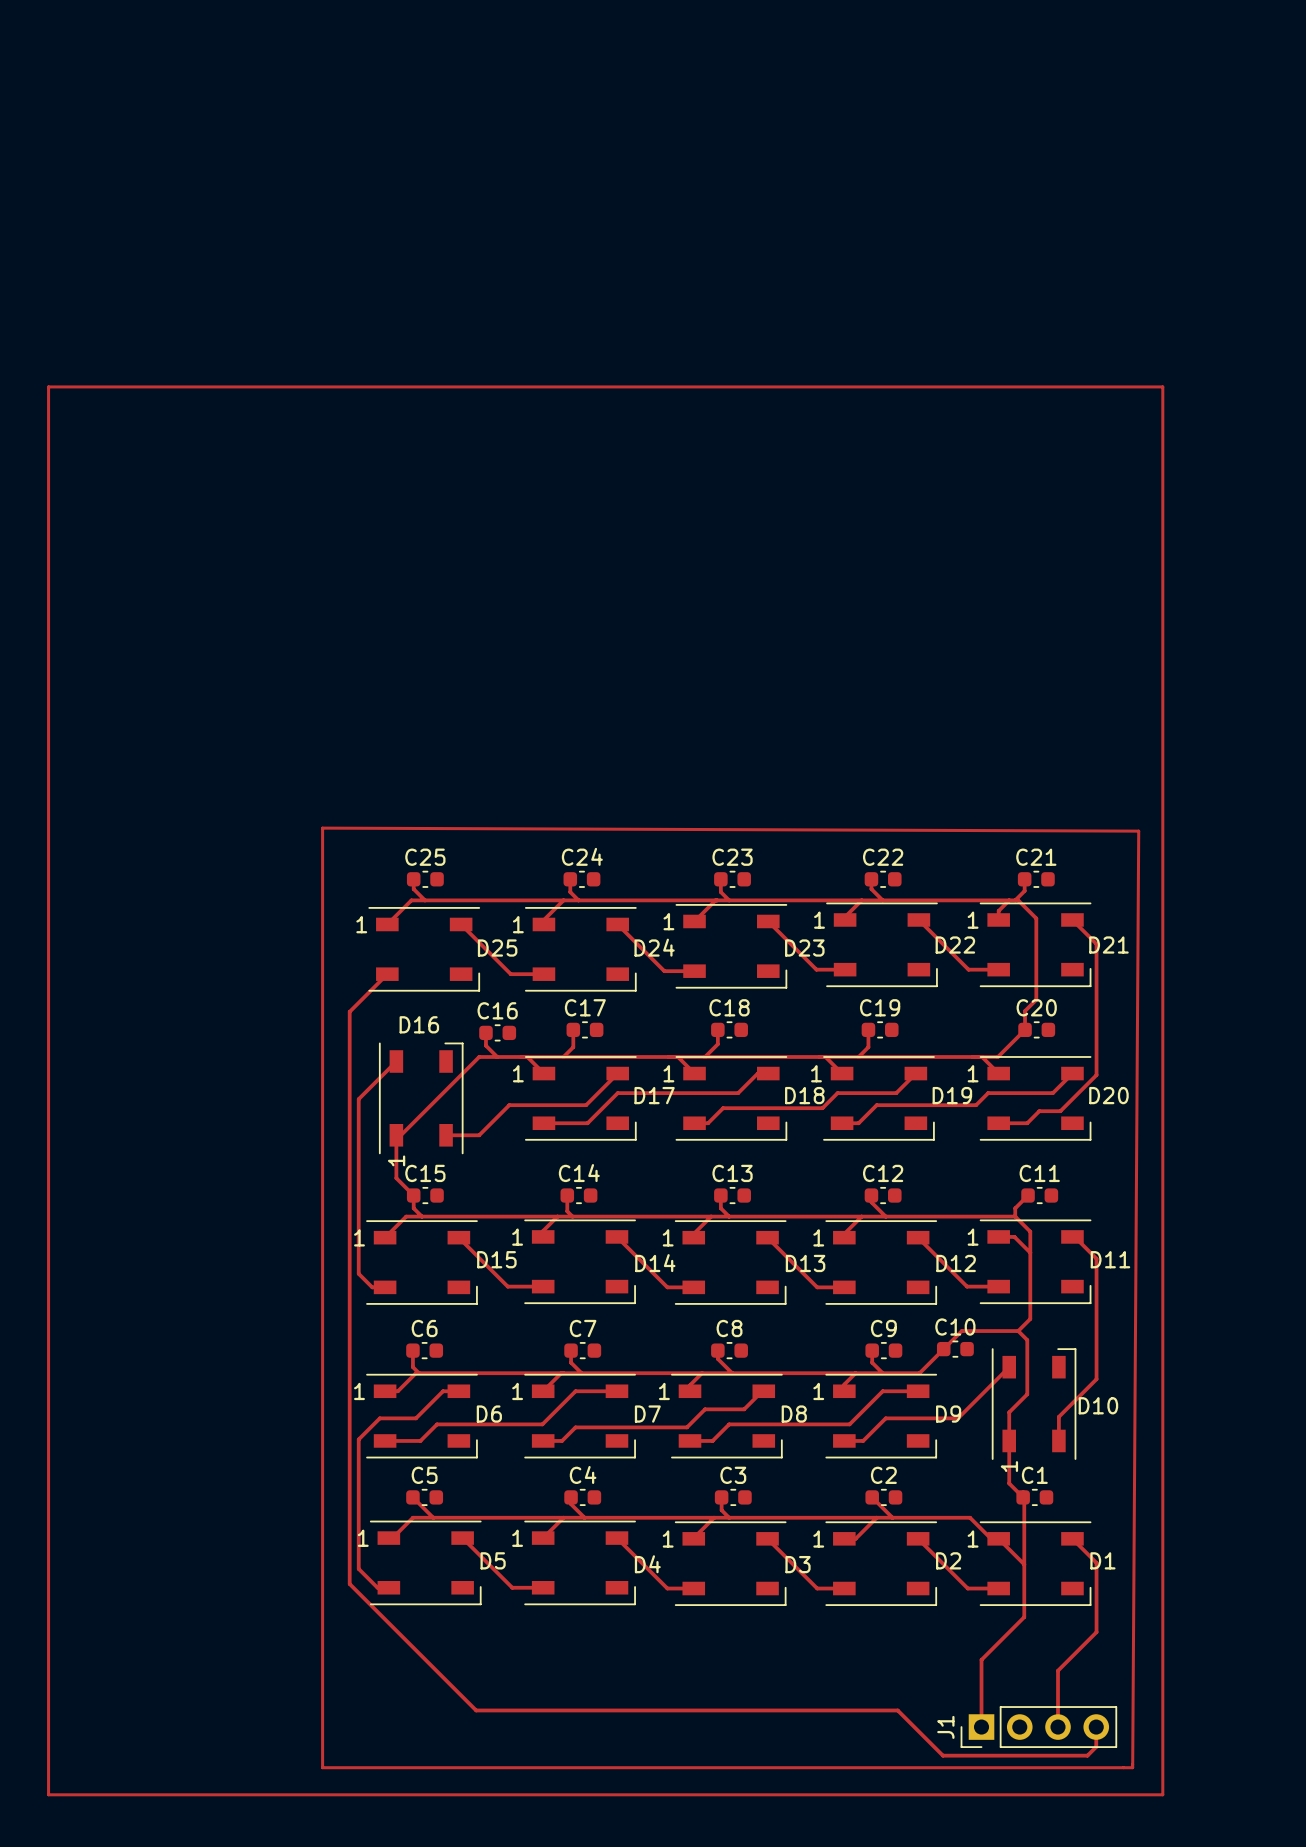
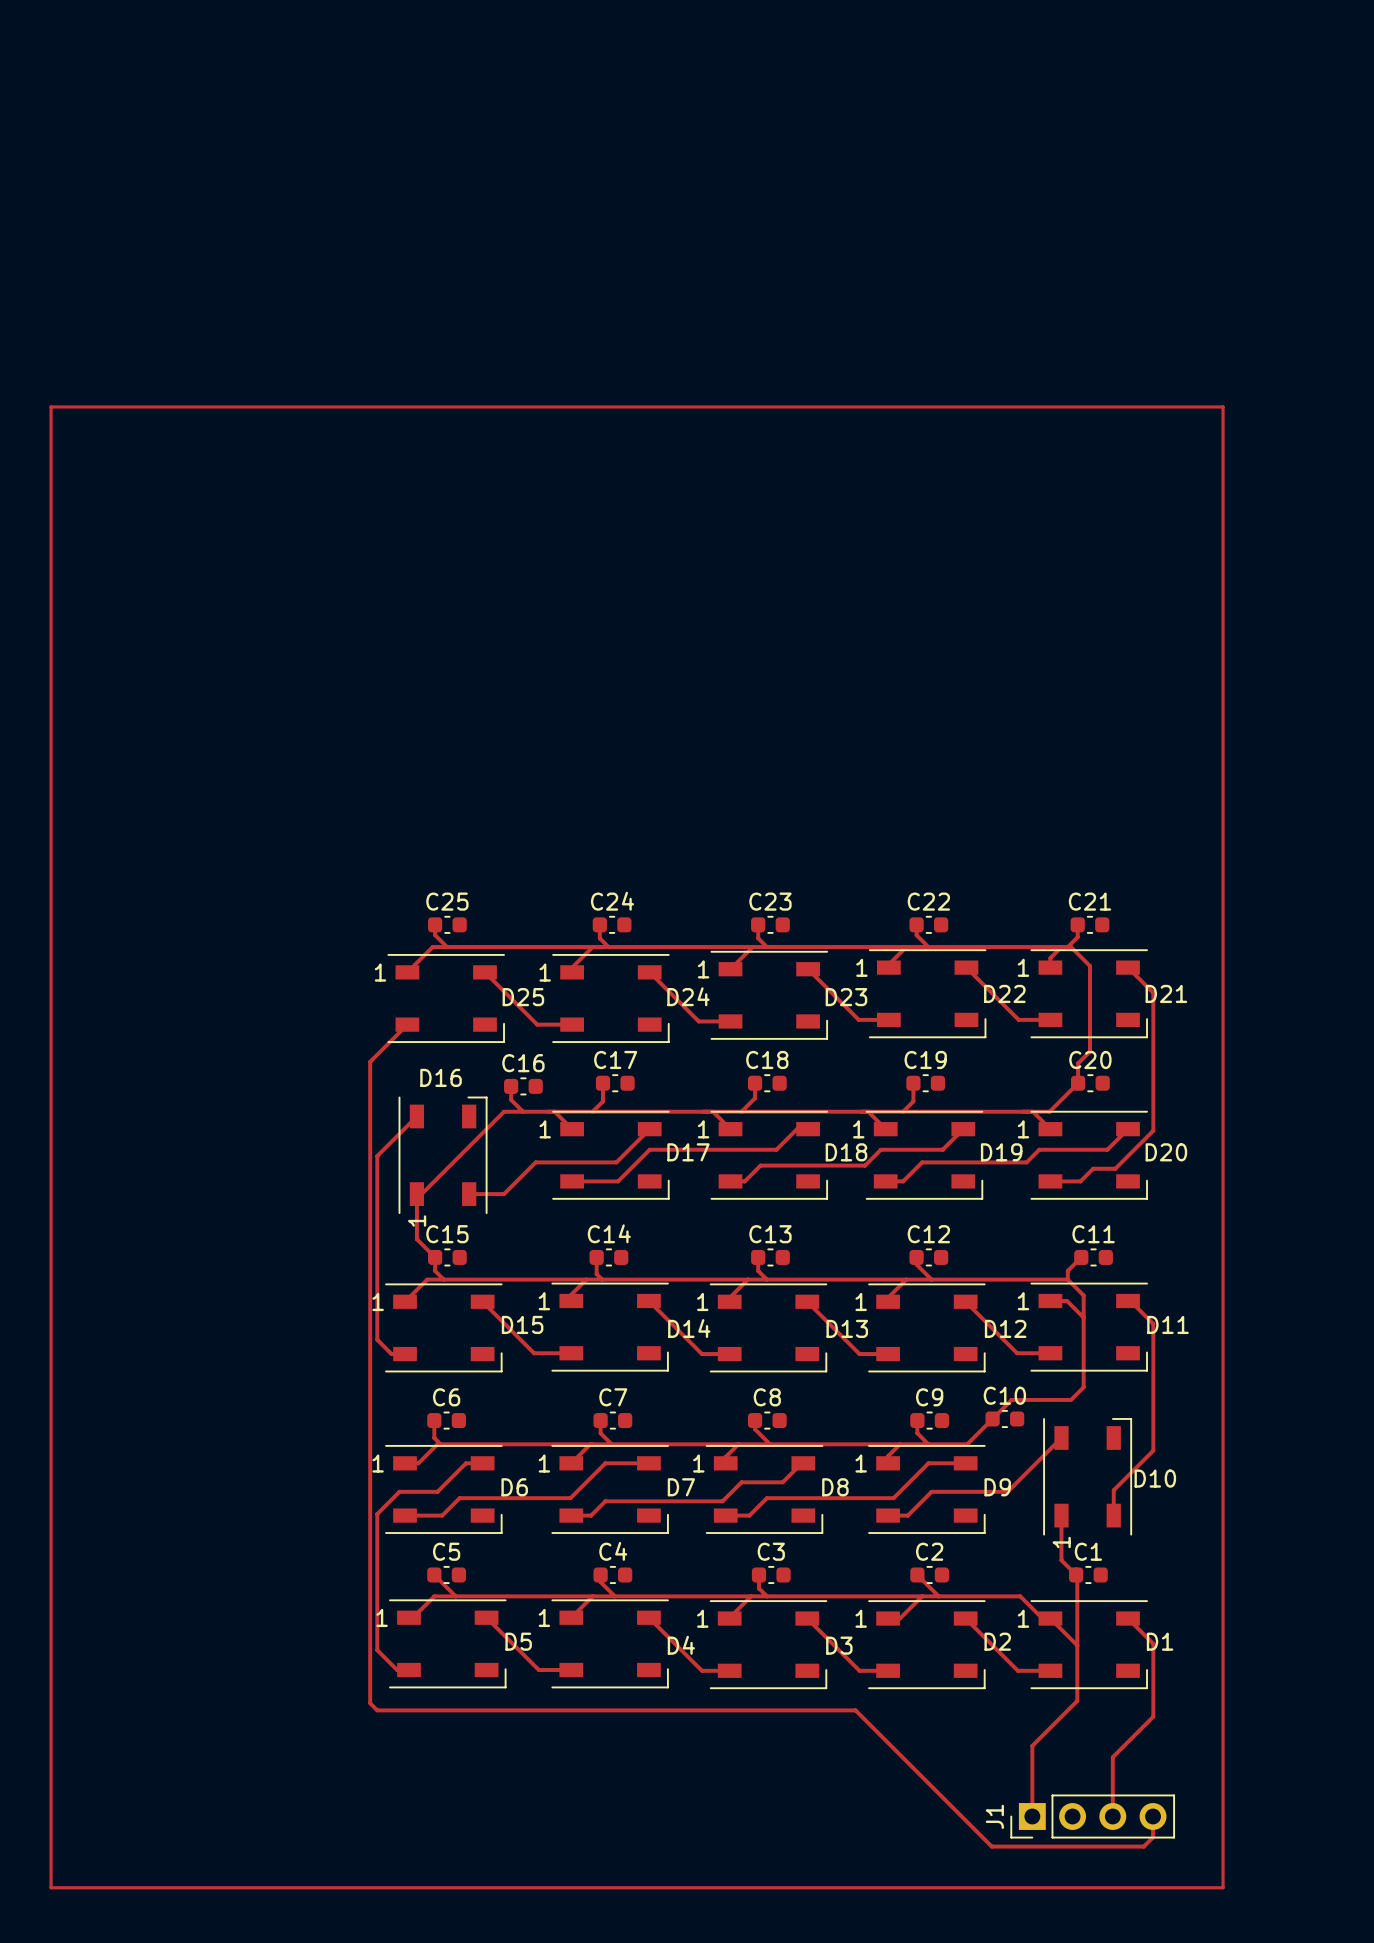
top track: (322, 828) (322, 1767) (1132, 1767) (1138, 831) (322, 828) -> none
top track: (351, 1009) (349, 1011) (349, 1584) (476, 1710) (897, 1710) -> (370, 1061) (370, 1703) (377, 1710) (855, 1710) (944, 1799)
top track: (1018, 1331) (1027, 1340) (1027, 1394) (1009, 1412) (1009, 1440) -> none

